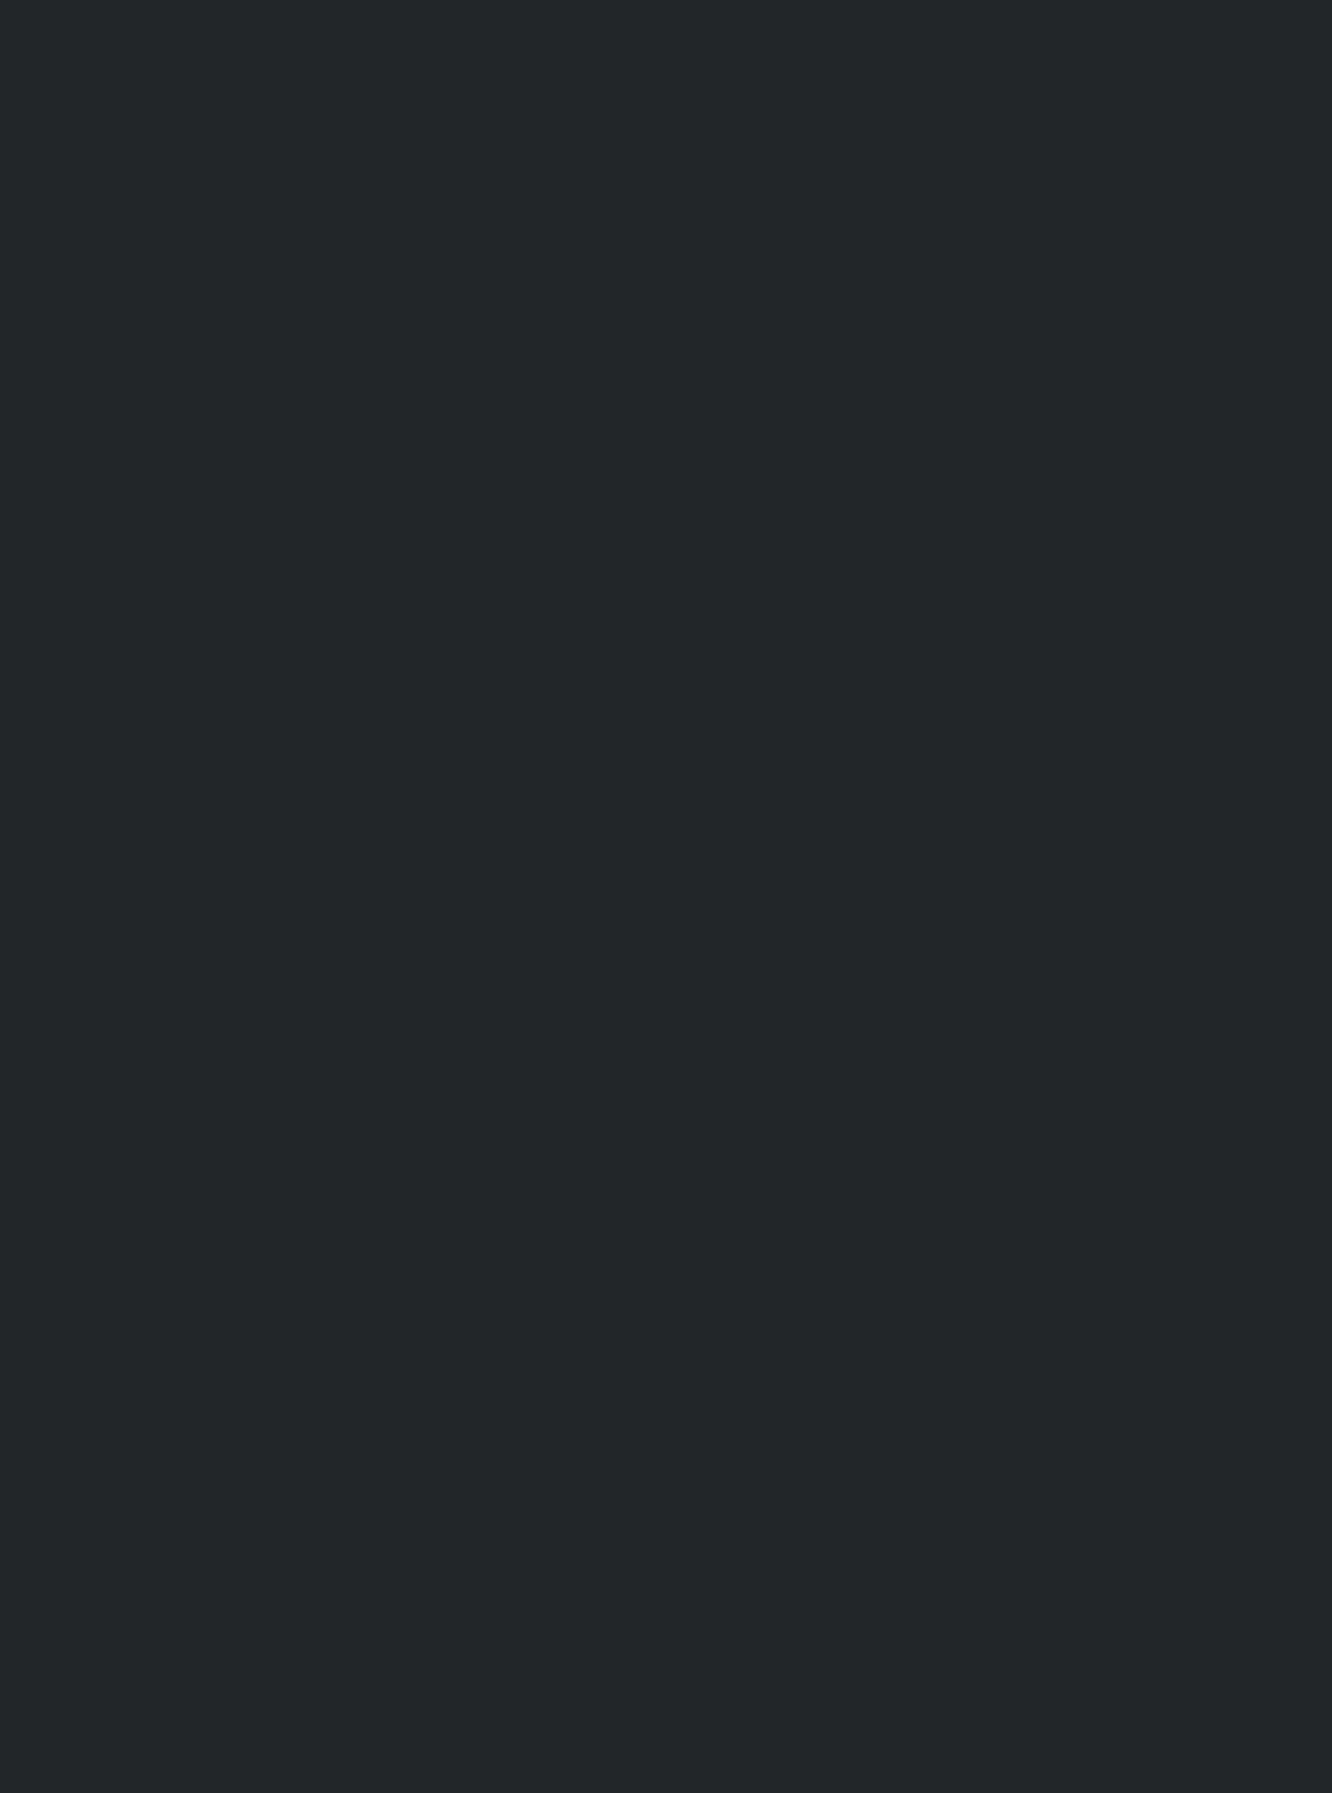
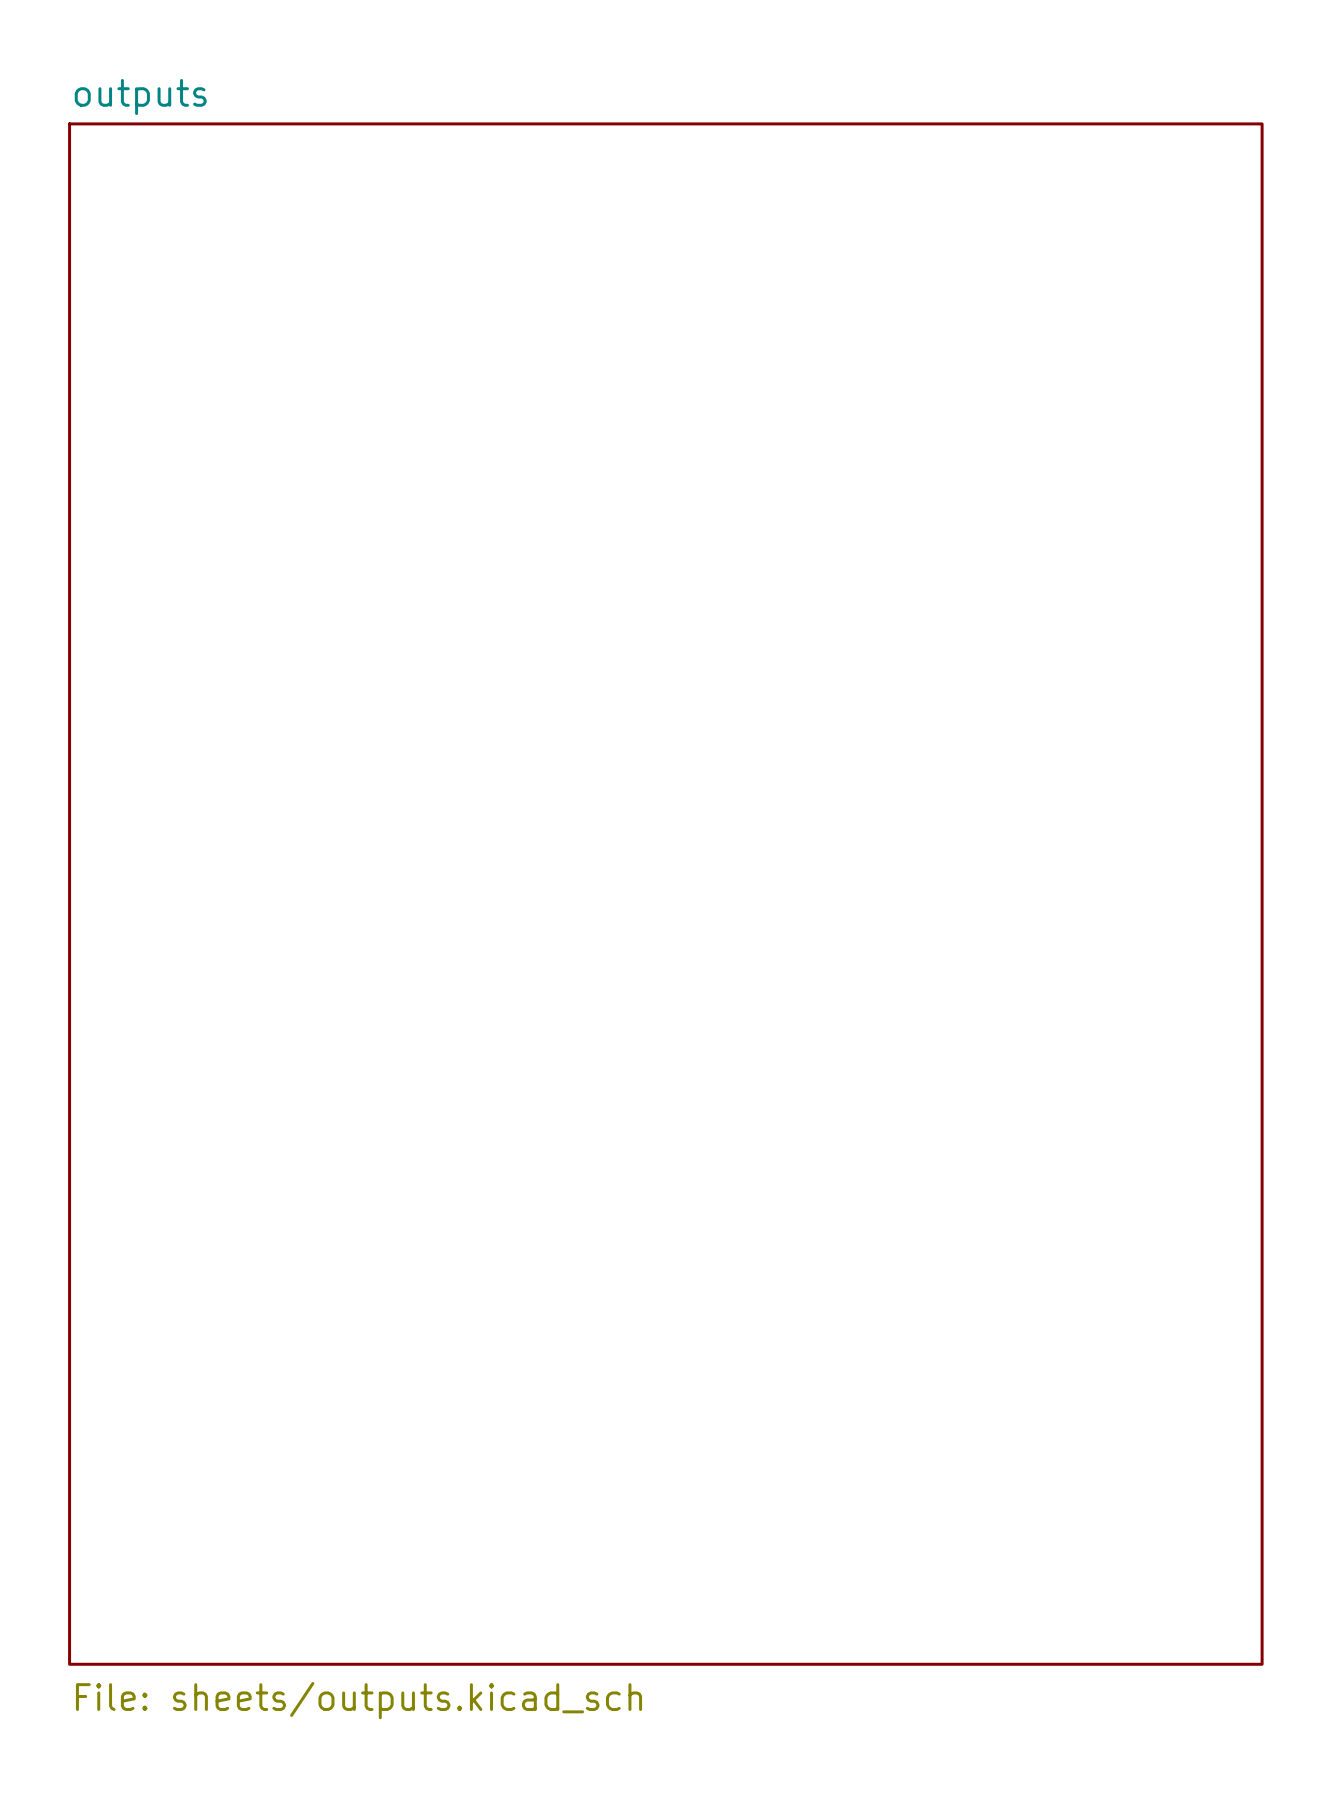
sheet outputs: none -> File: sheets/outputs.kicad_sch (665, 894)

